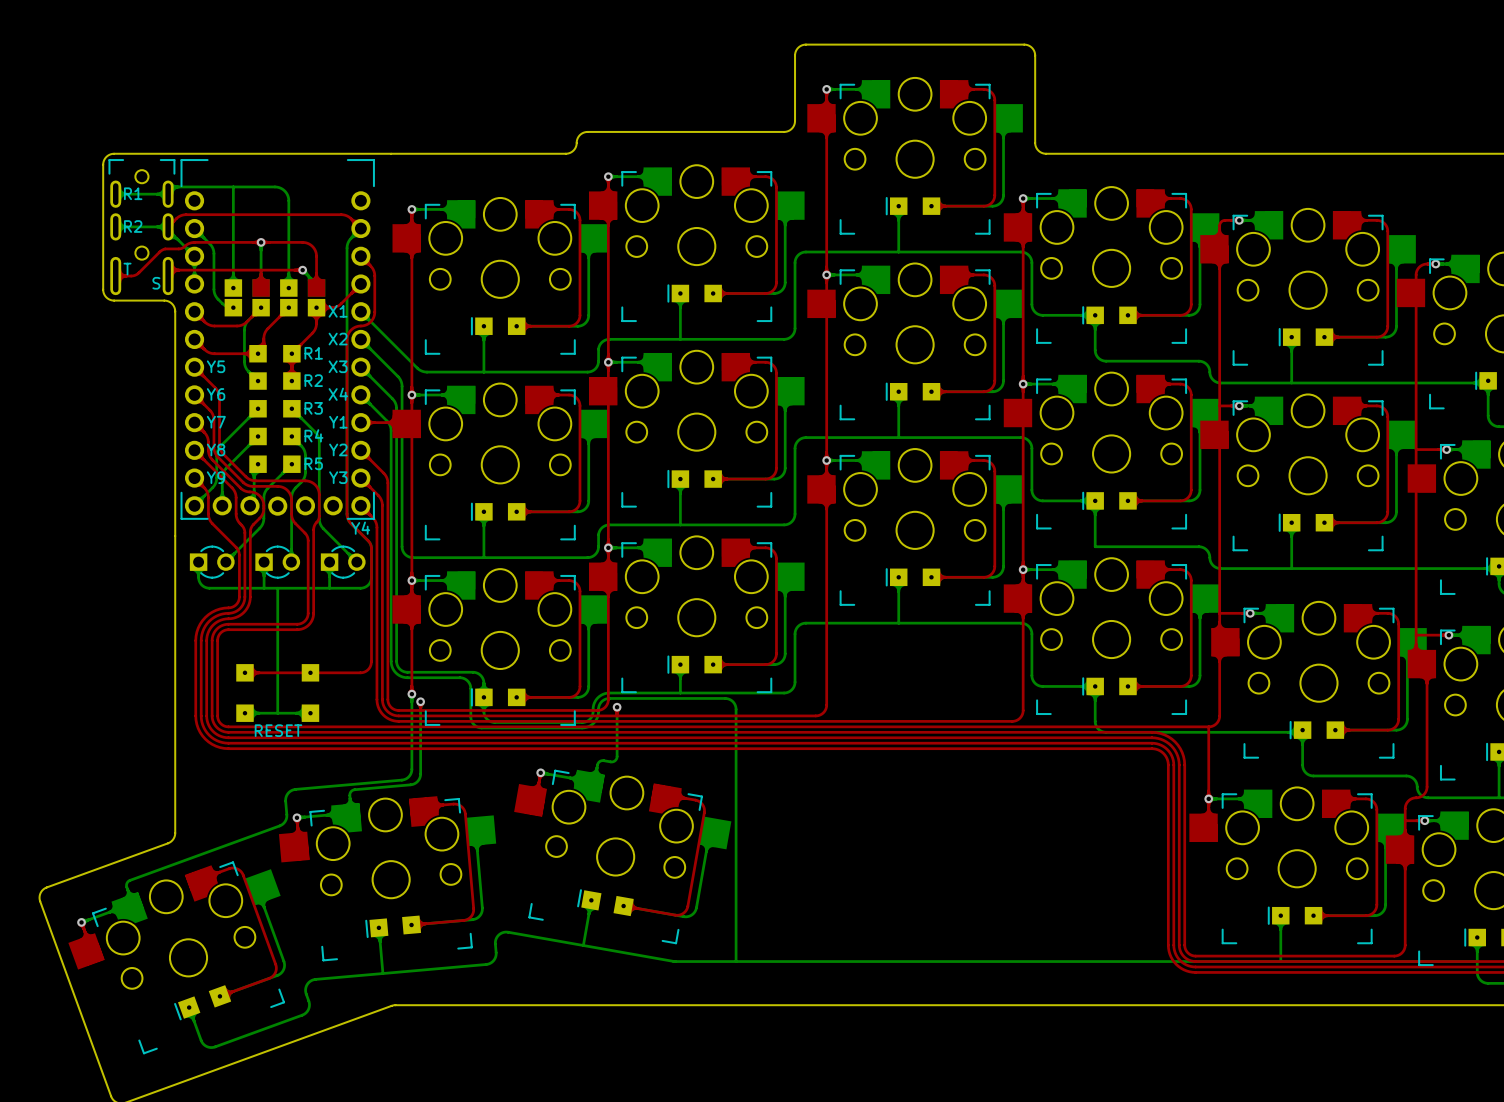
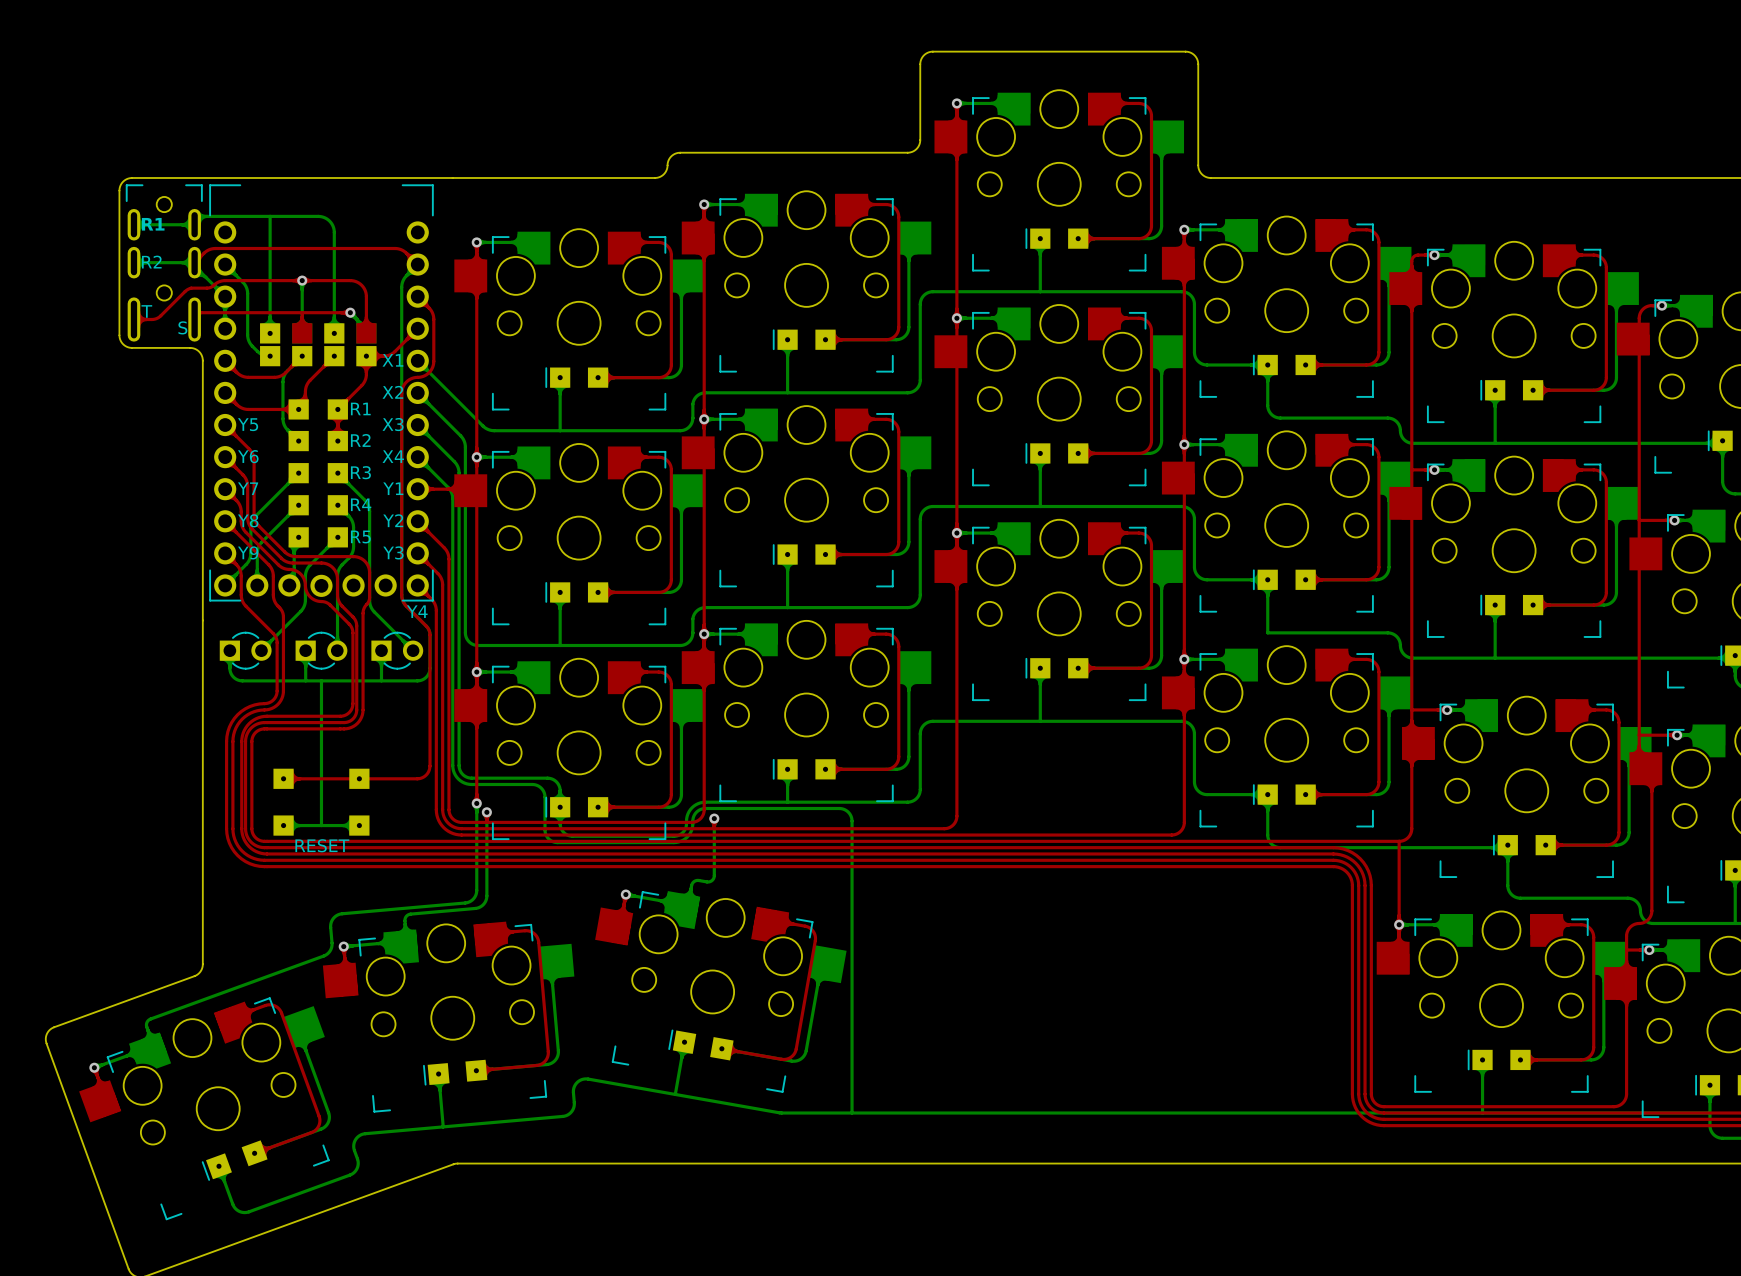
top track: (172, 263) (174, 268) (179, 270) (174, 272) (172, 276) -> none
top track: (263, 505) (262, 514) (250, 530) (250, 596) (248, 606) (237, 616) (221, 620) (214, 623) (208, 631) (206, 638) (207, 720) (214, 733) (221, 736) (230, 737) -> (305, 585) (310, 596) (329, 604) (351, 628) (352, 705) (349, 712) (343, 715) (264, 716) (253, 720) (245, 728) (241, 741) (242, 834) (251, 848) (267, 853)

